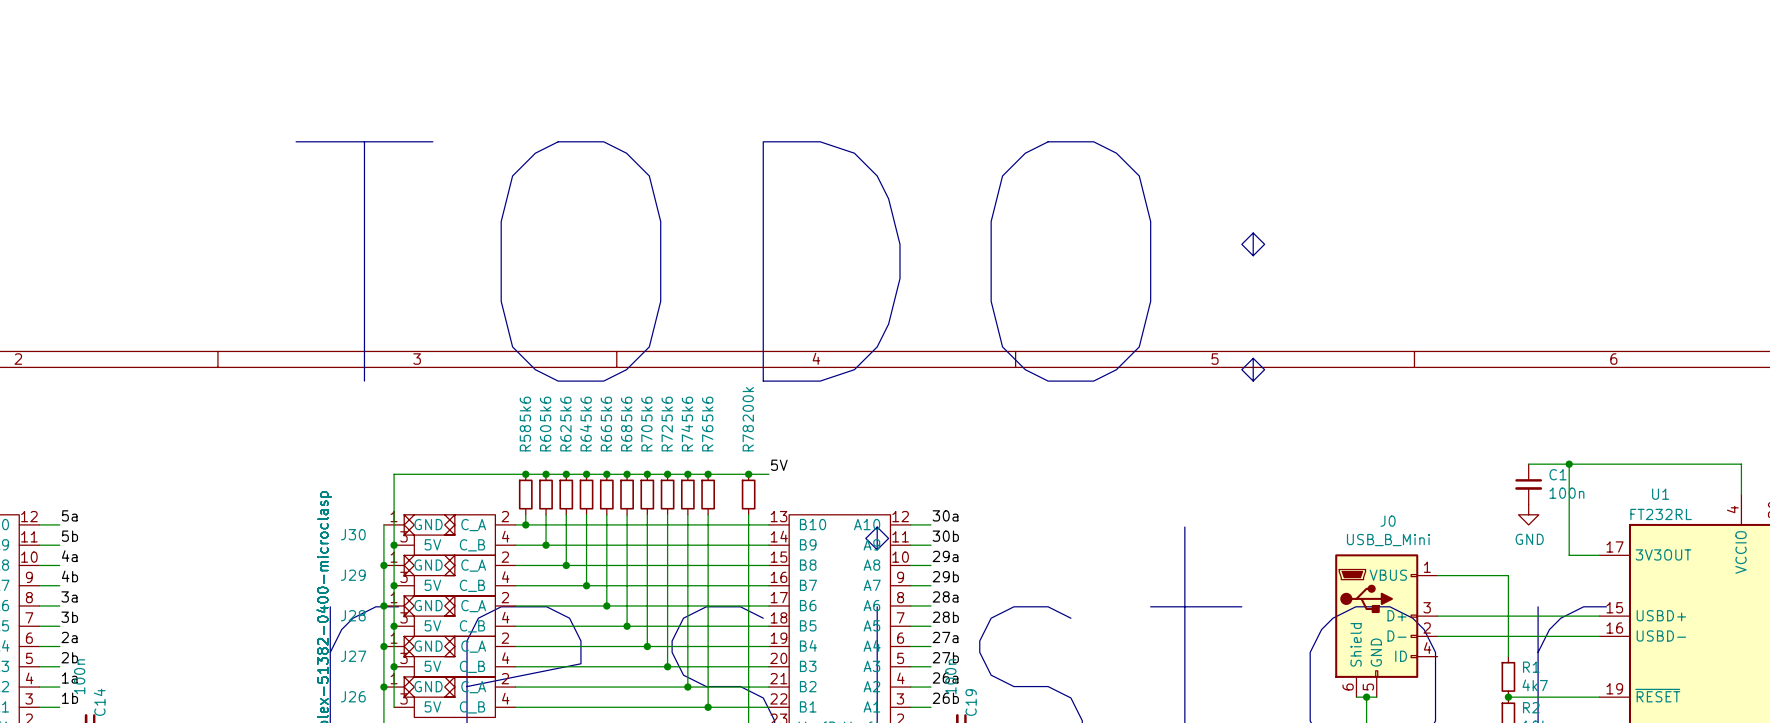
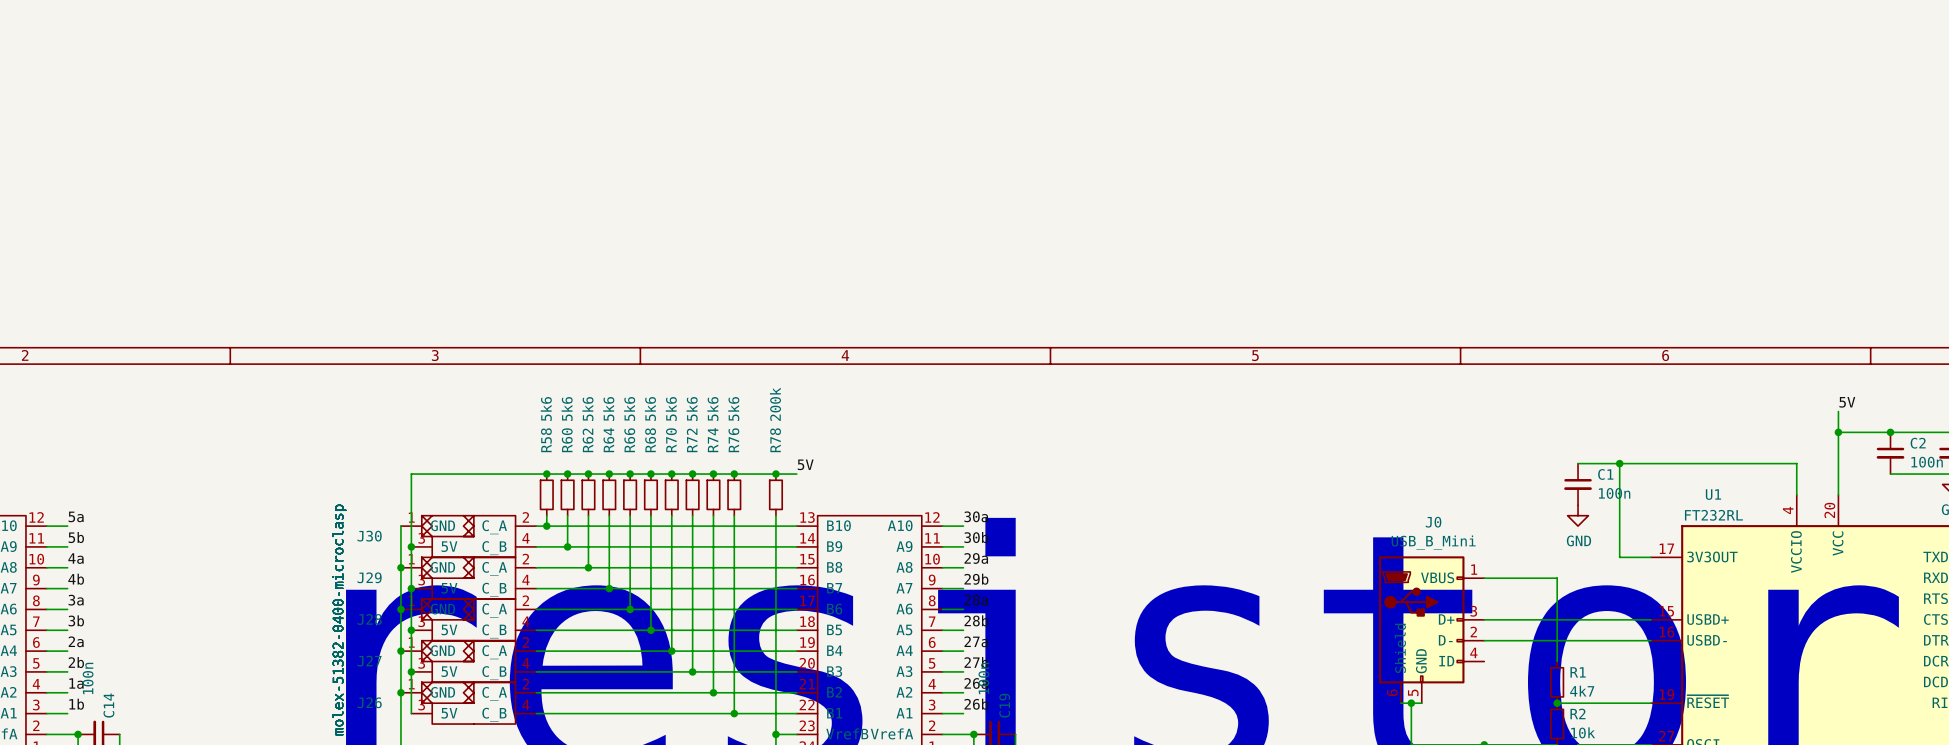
text: TODO: (780, 261) -> none

